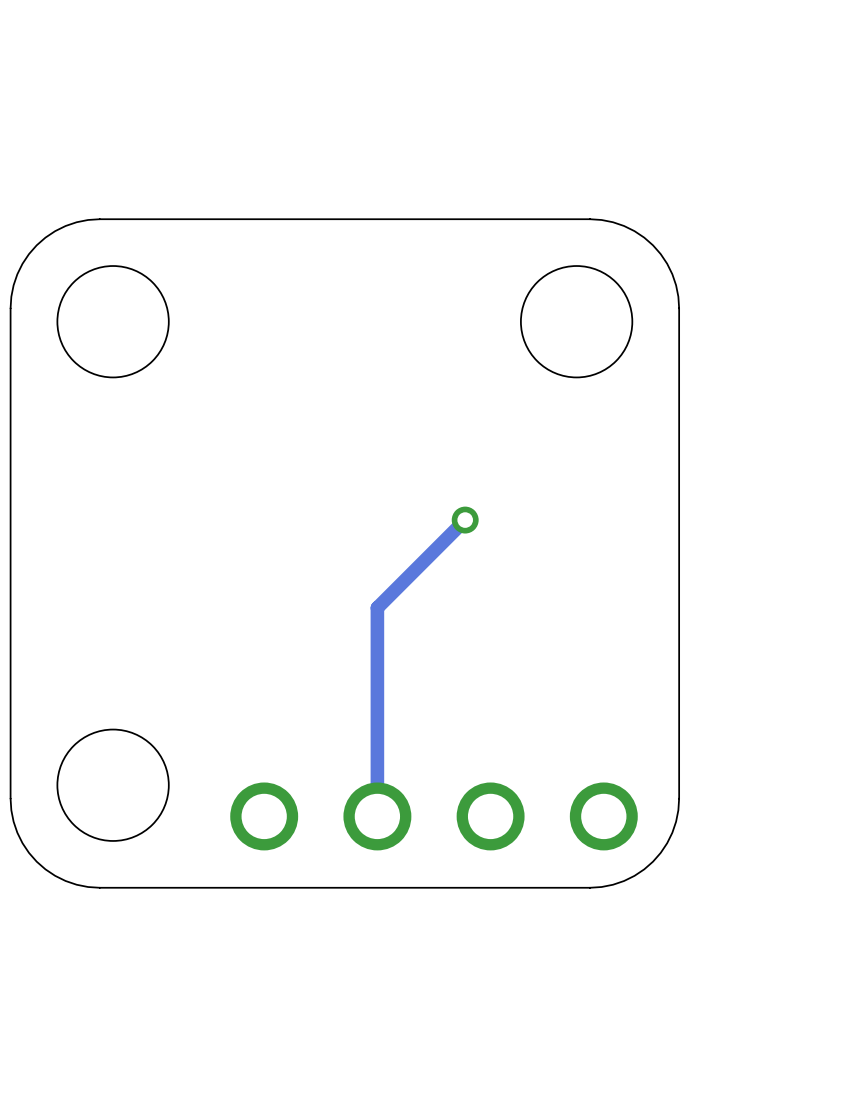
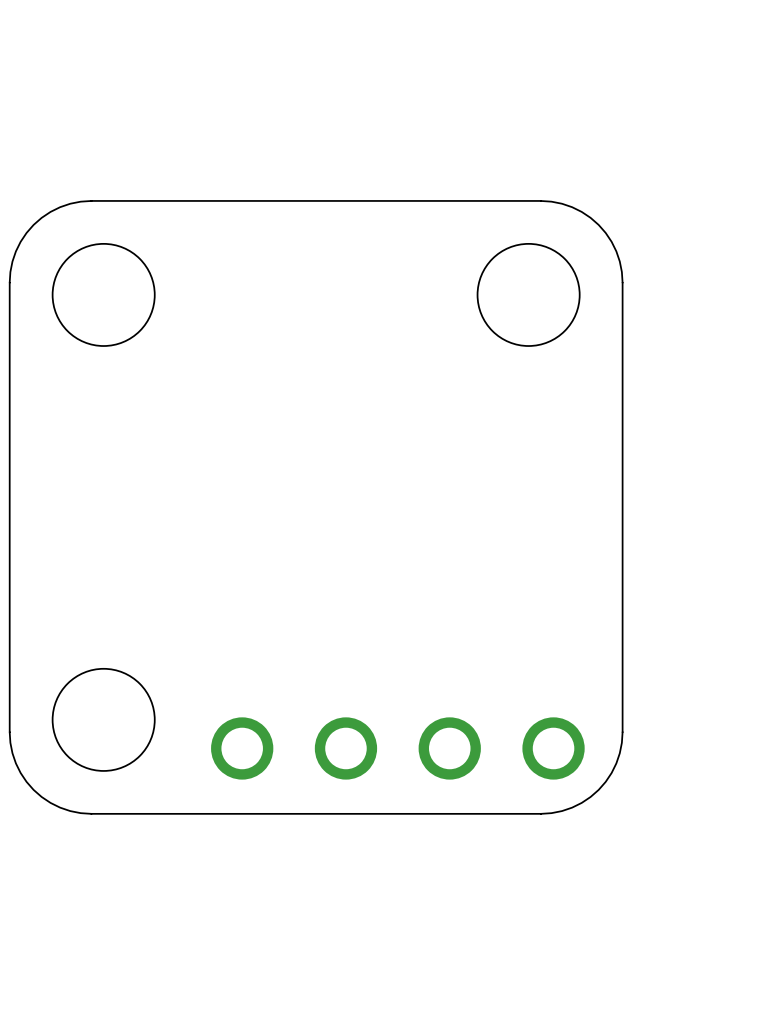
track: (465, 520) (377, 607) (377, 816) -> none
via: (465, 520) -> none

